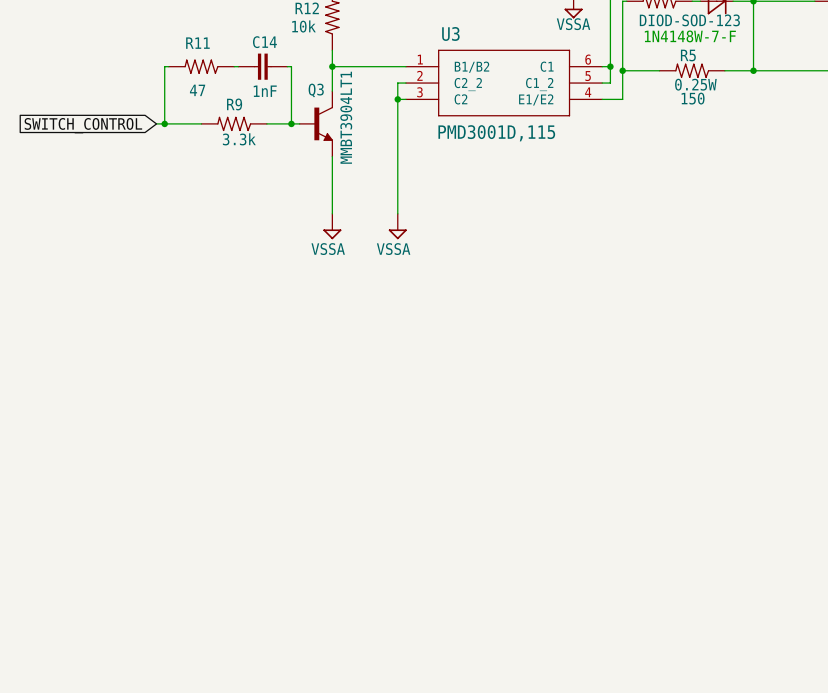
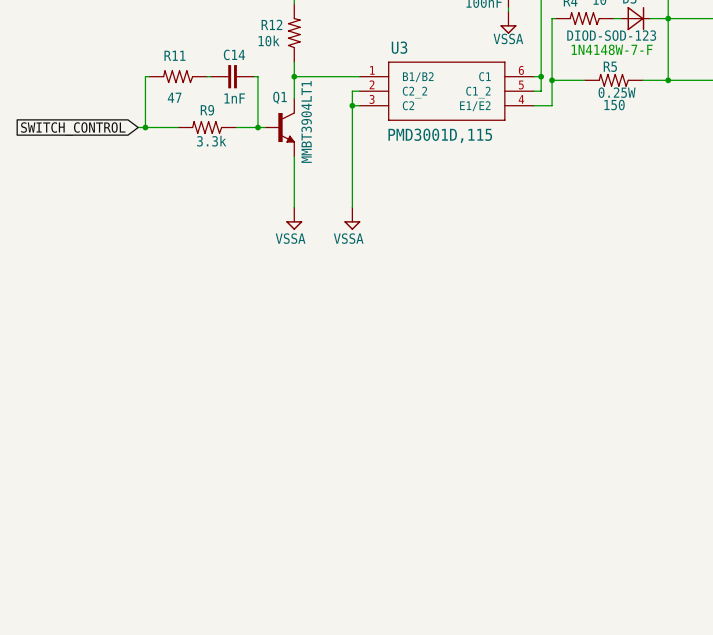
Q3 name: Q3 (316, 90) -> Q1 (279, 97)

